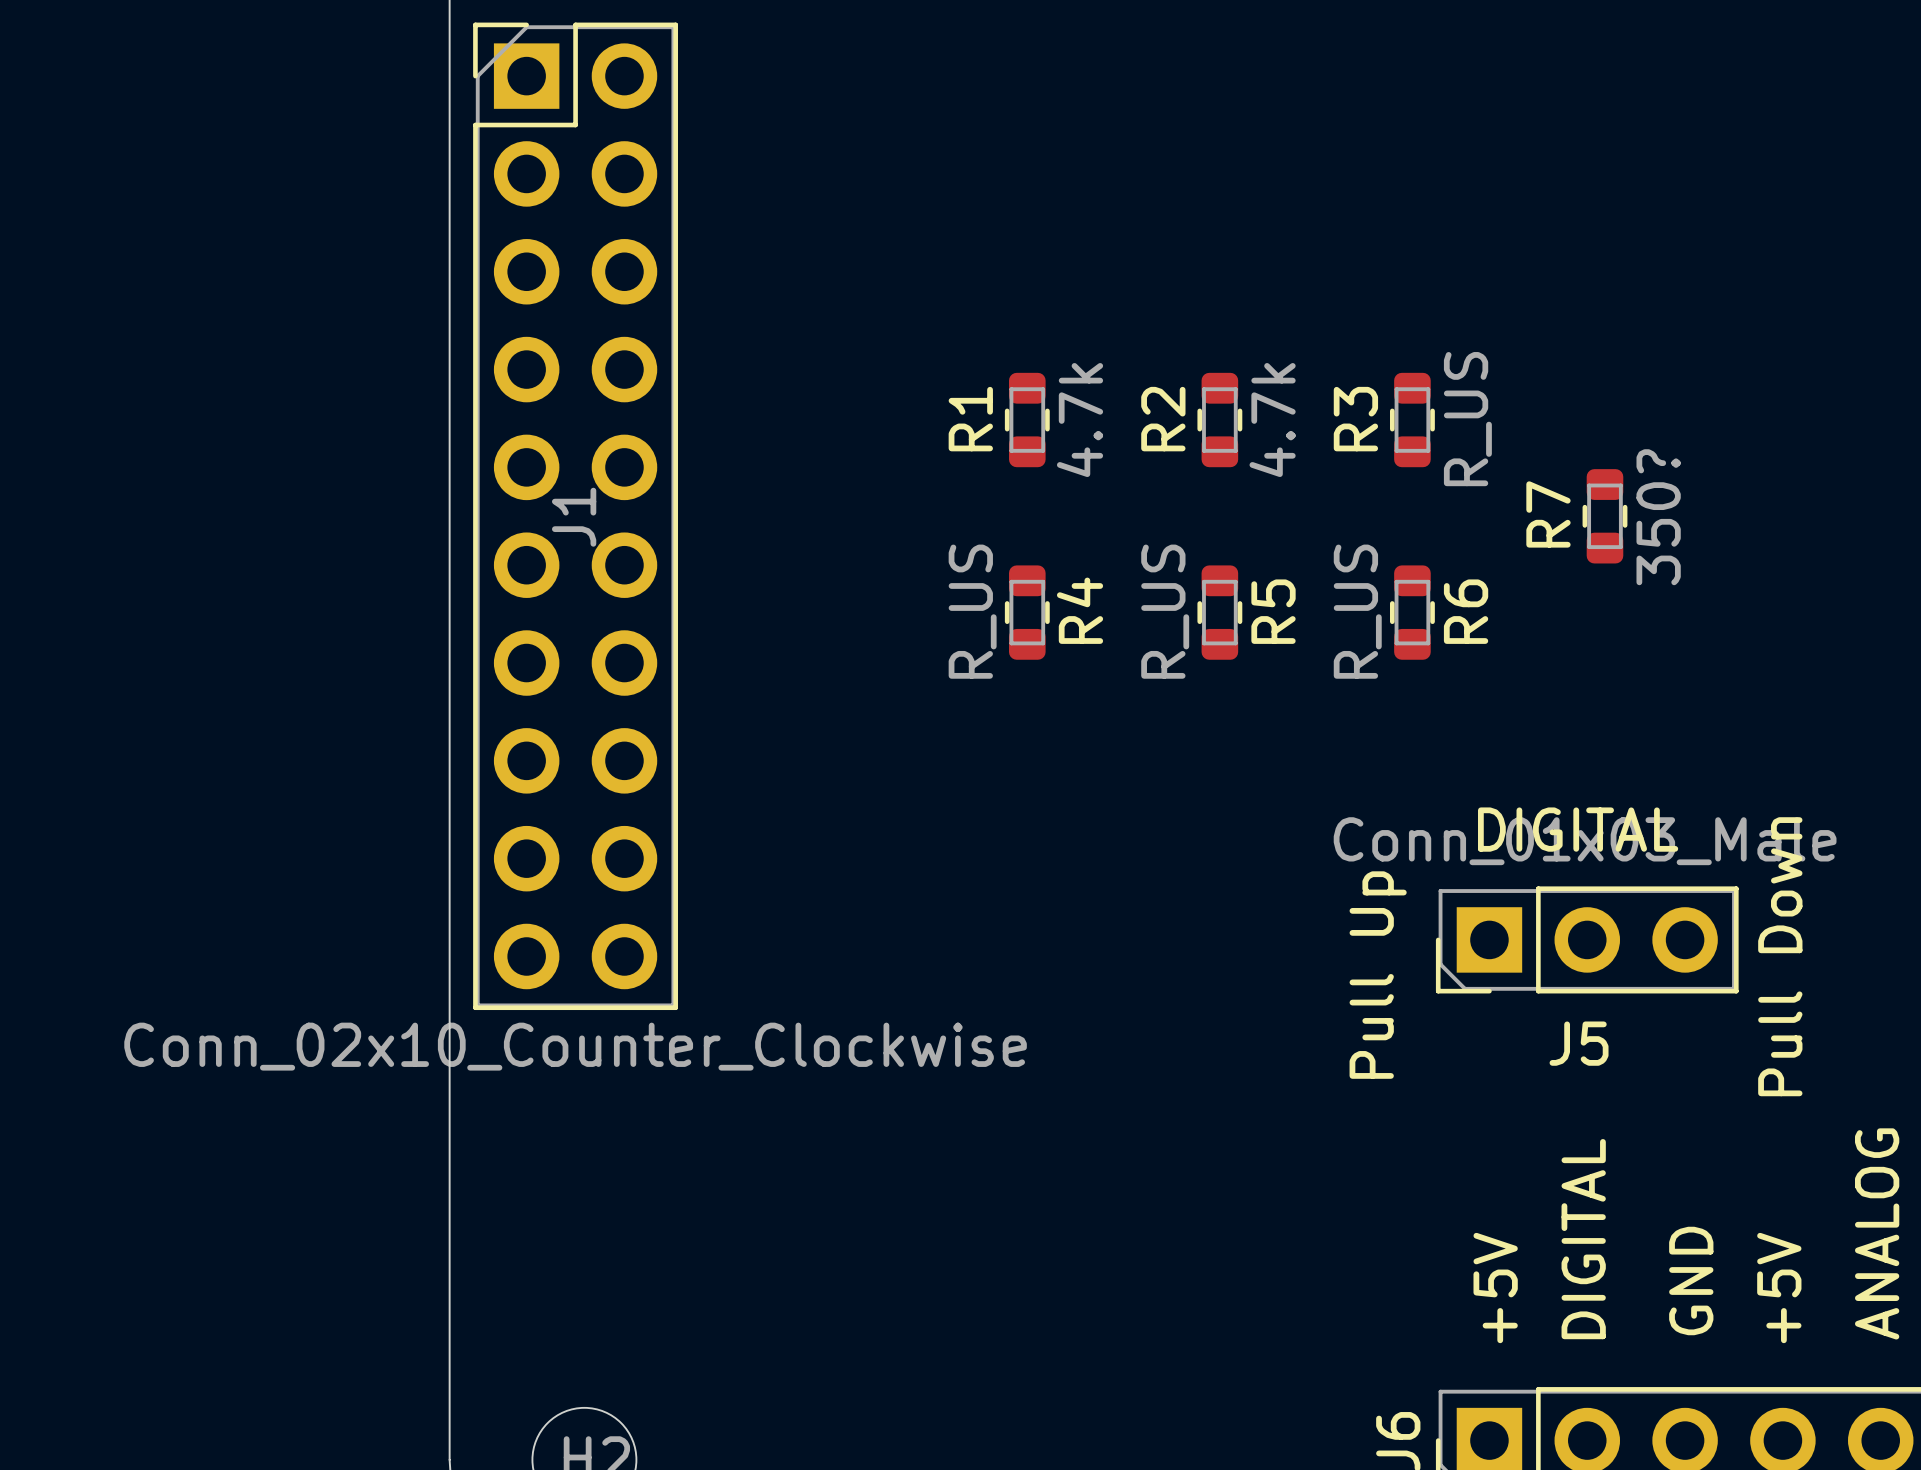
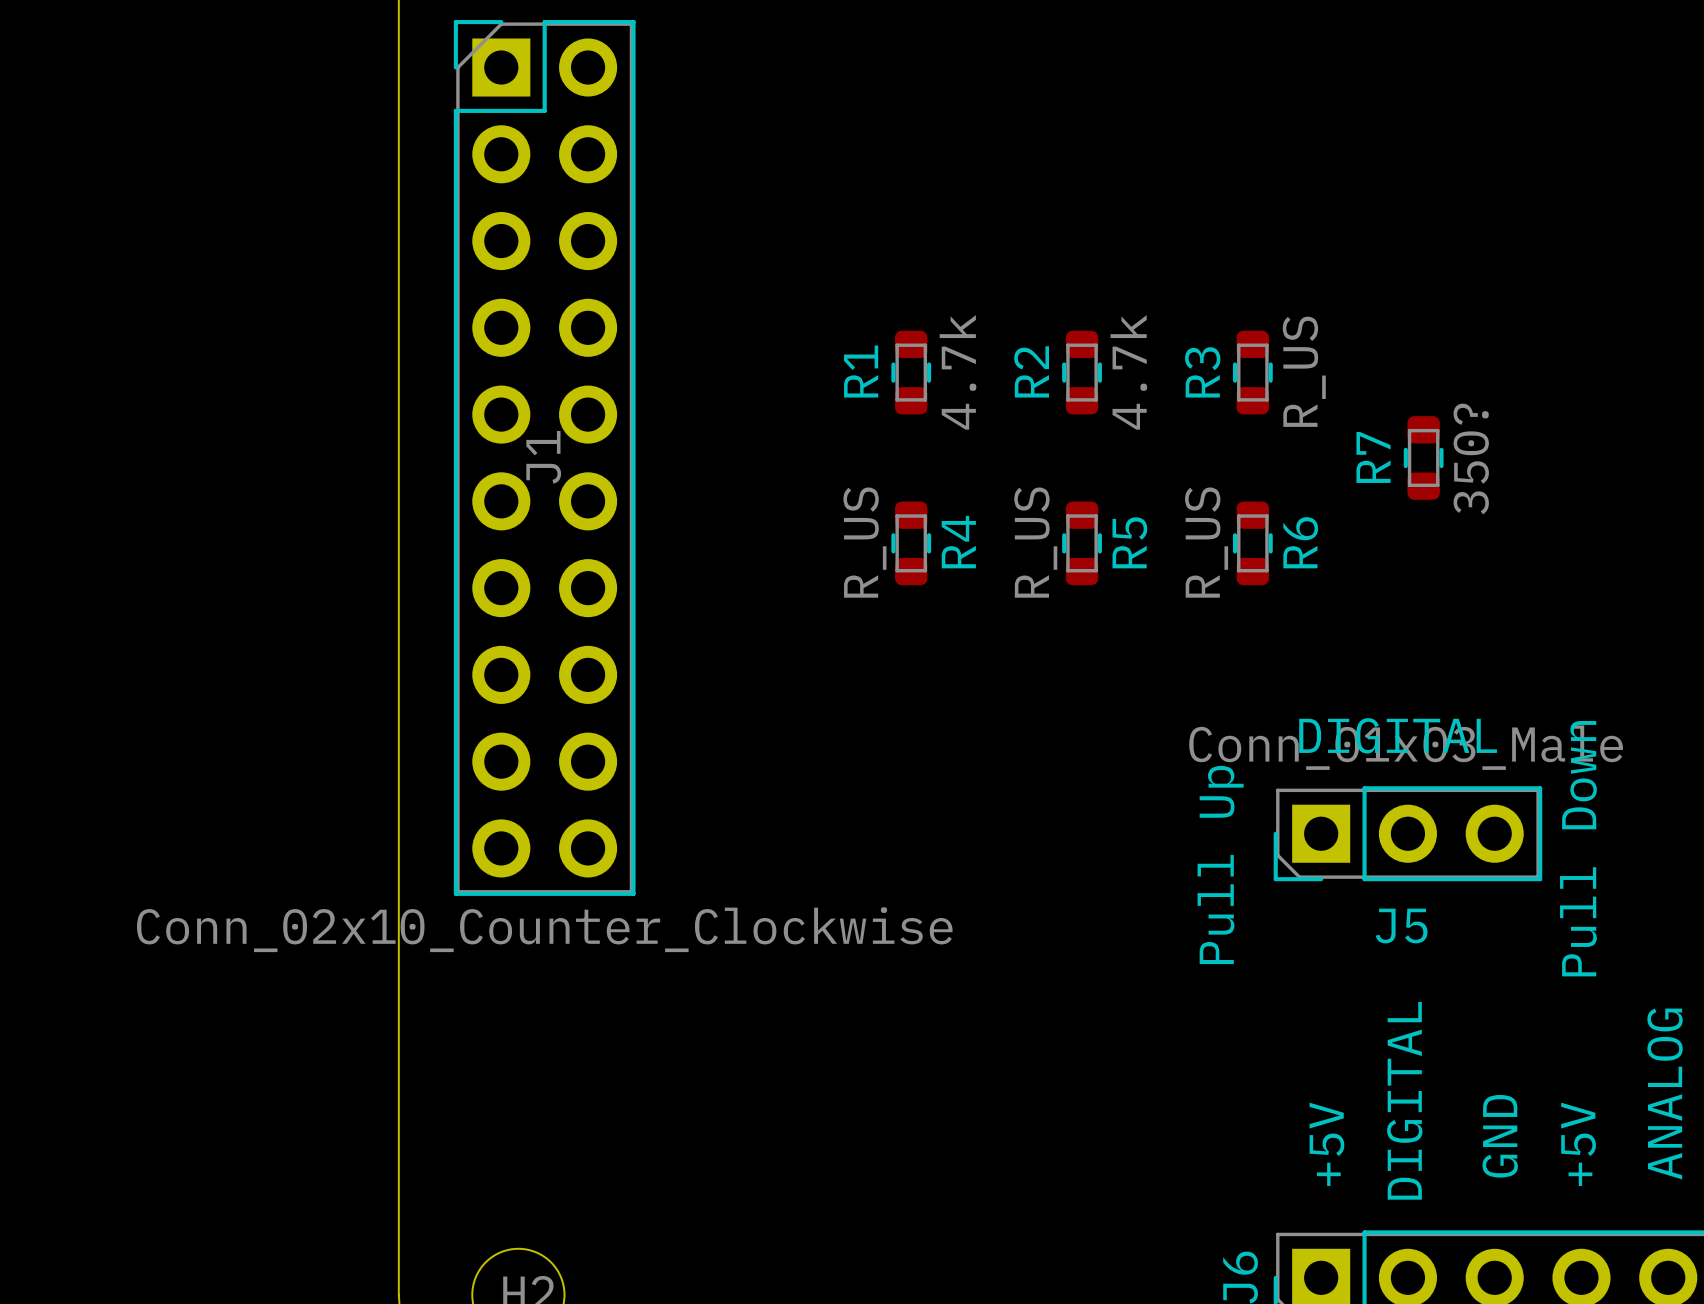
J1 position: (575, 516) -> (544, 457)

